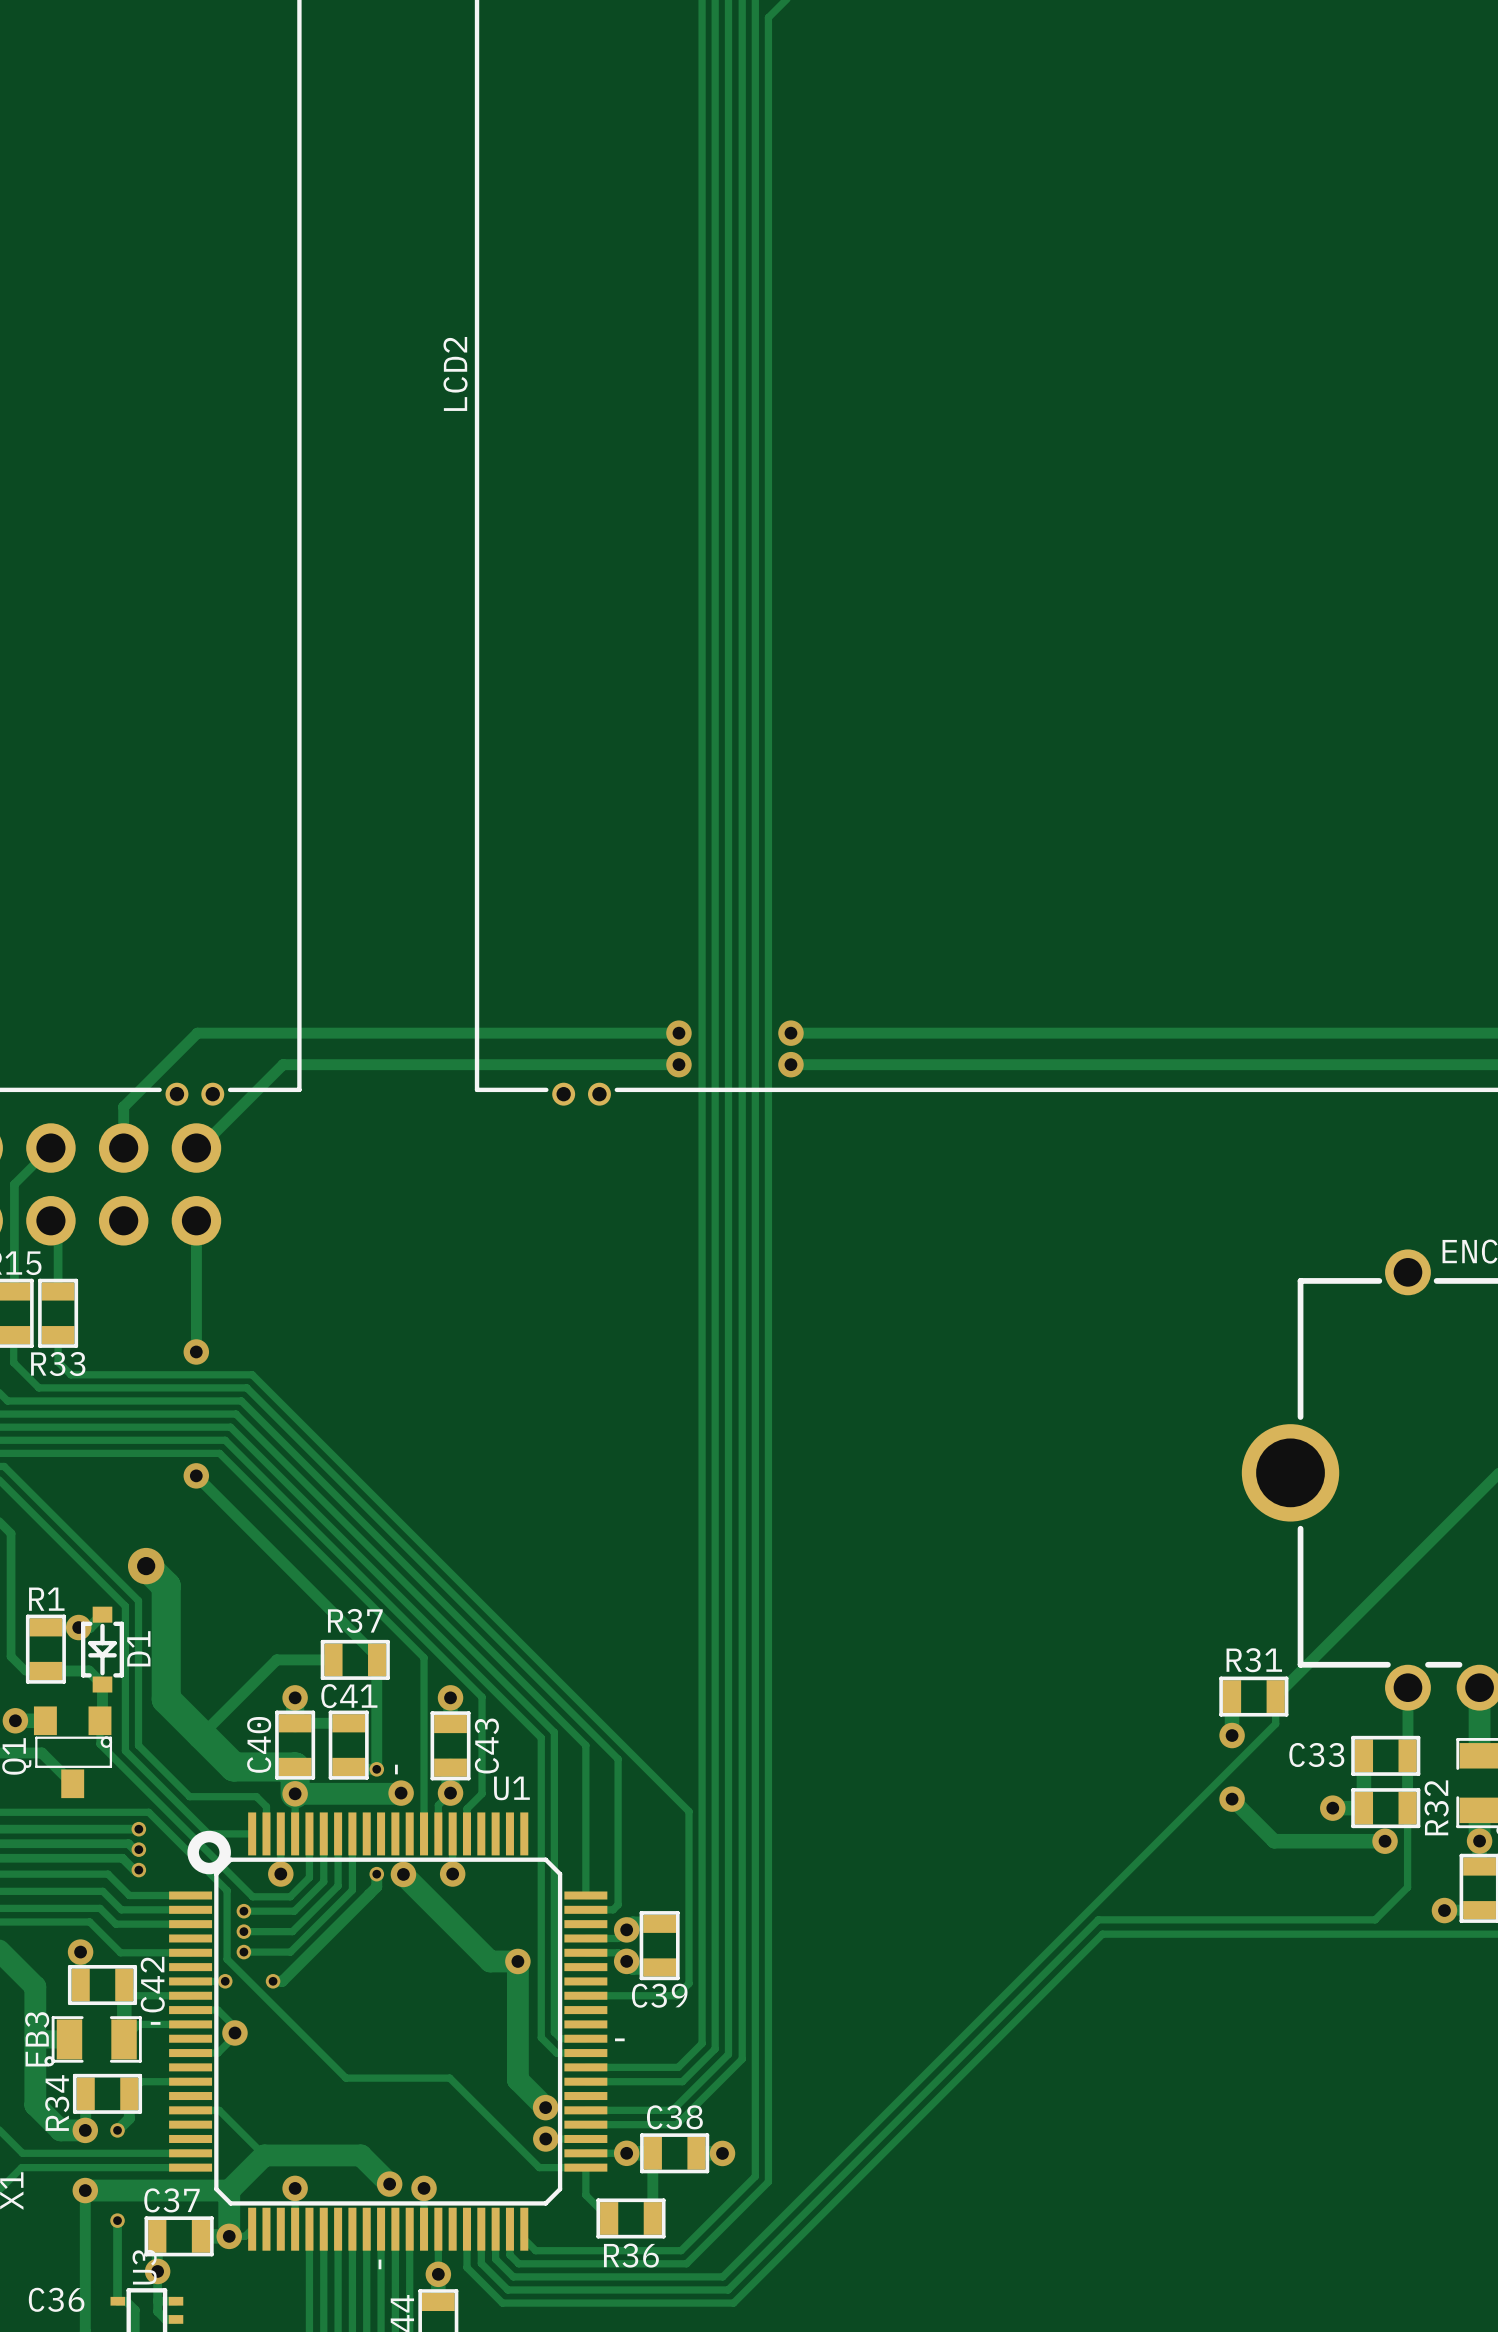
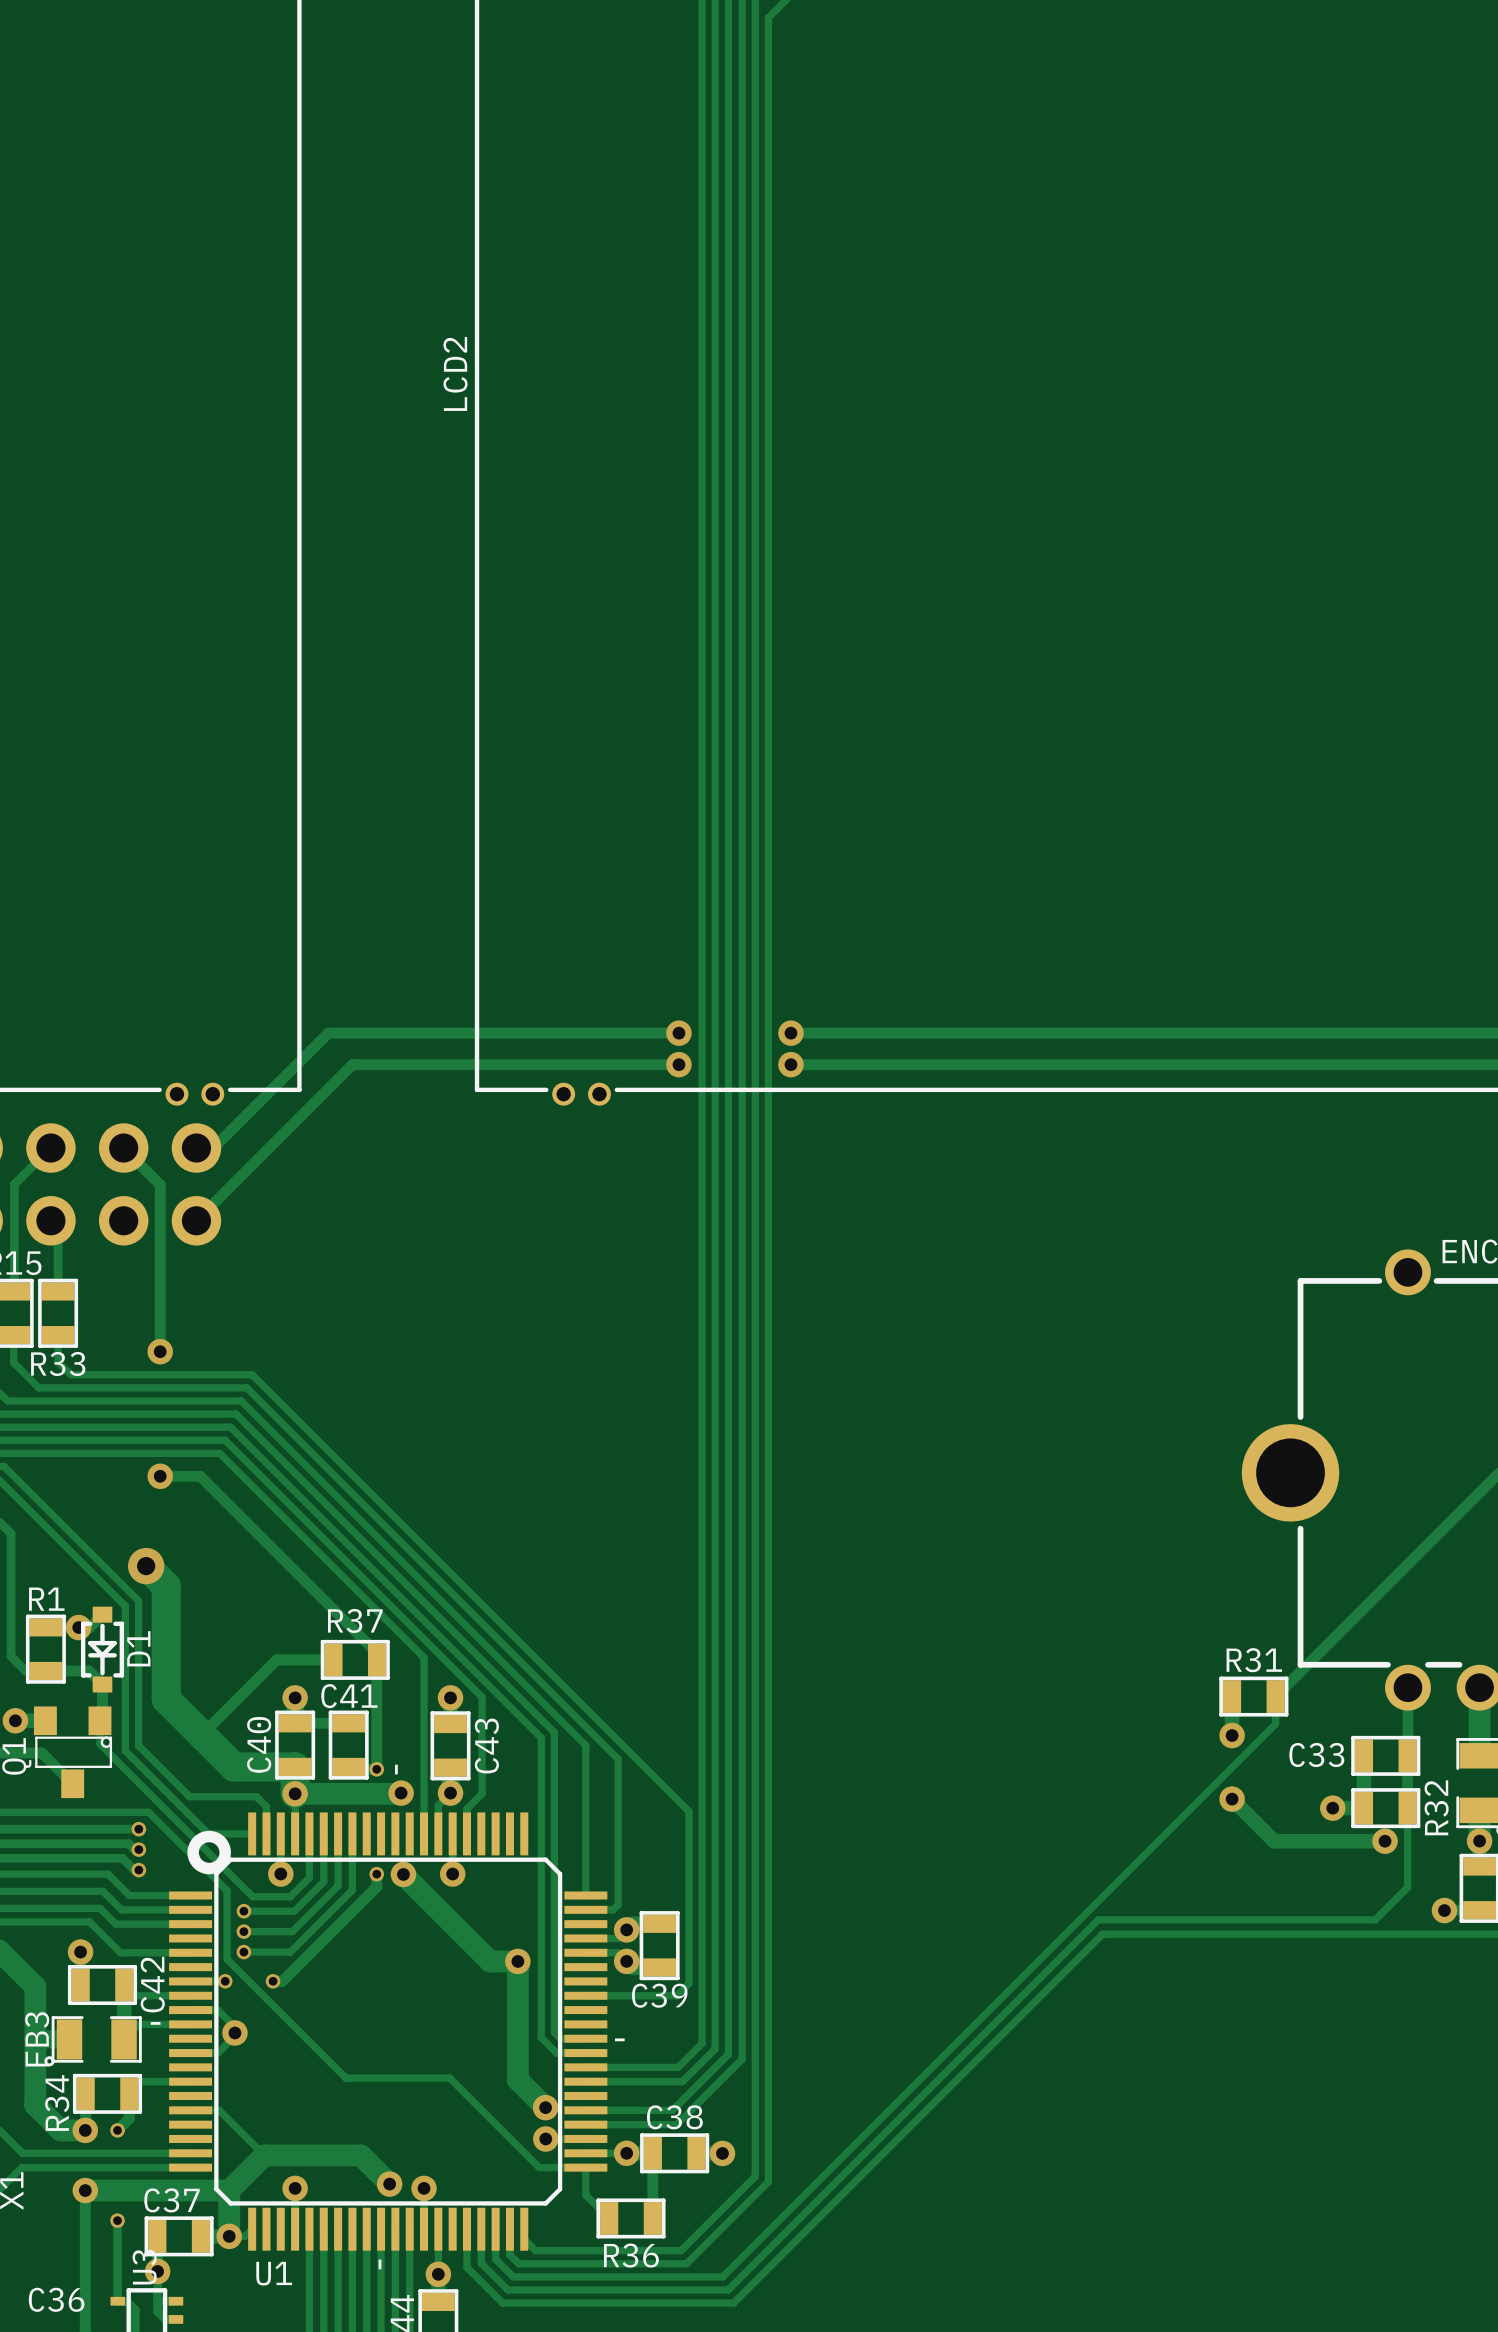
track: (328, 1033) (197, 1033) (123, 1106) (123, 1148) -> (160, 1351) (160, 1184) (123, 1148)
track: (352, 1064) (283, 1064) (199, 1148) -> (328, 1033) (213, 1148) (199, 1148)
track: (196, 1221) (196, 1351) -> (196, 1220) (352, 1064)
via position: (196, 1351) -> (160, 1351)
track: (196, 1475) (377, 1656) -> (160, 1476) (200, 1476) (377, 1653) (377, 1656)
via position: (196, 1475) -> (160, 1476)
U1 name position: U1 (511, 1788) -> U1 (274, 2273)

